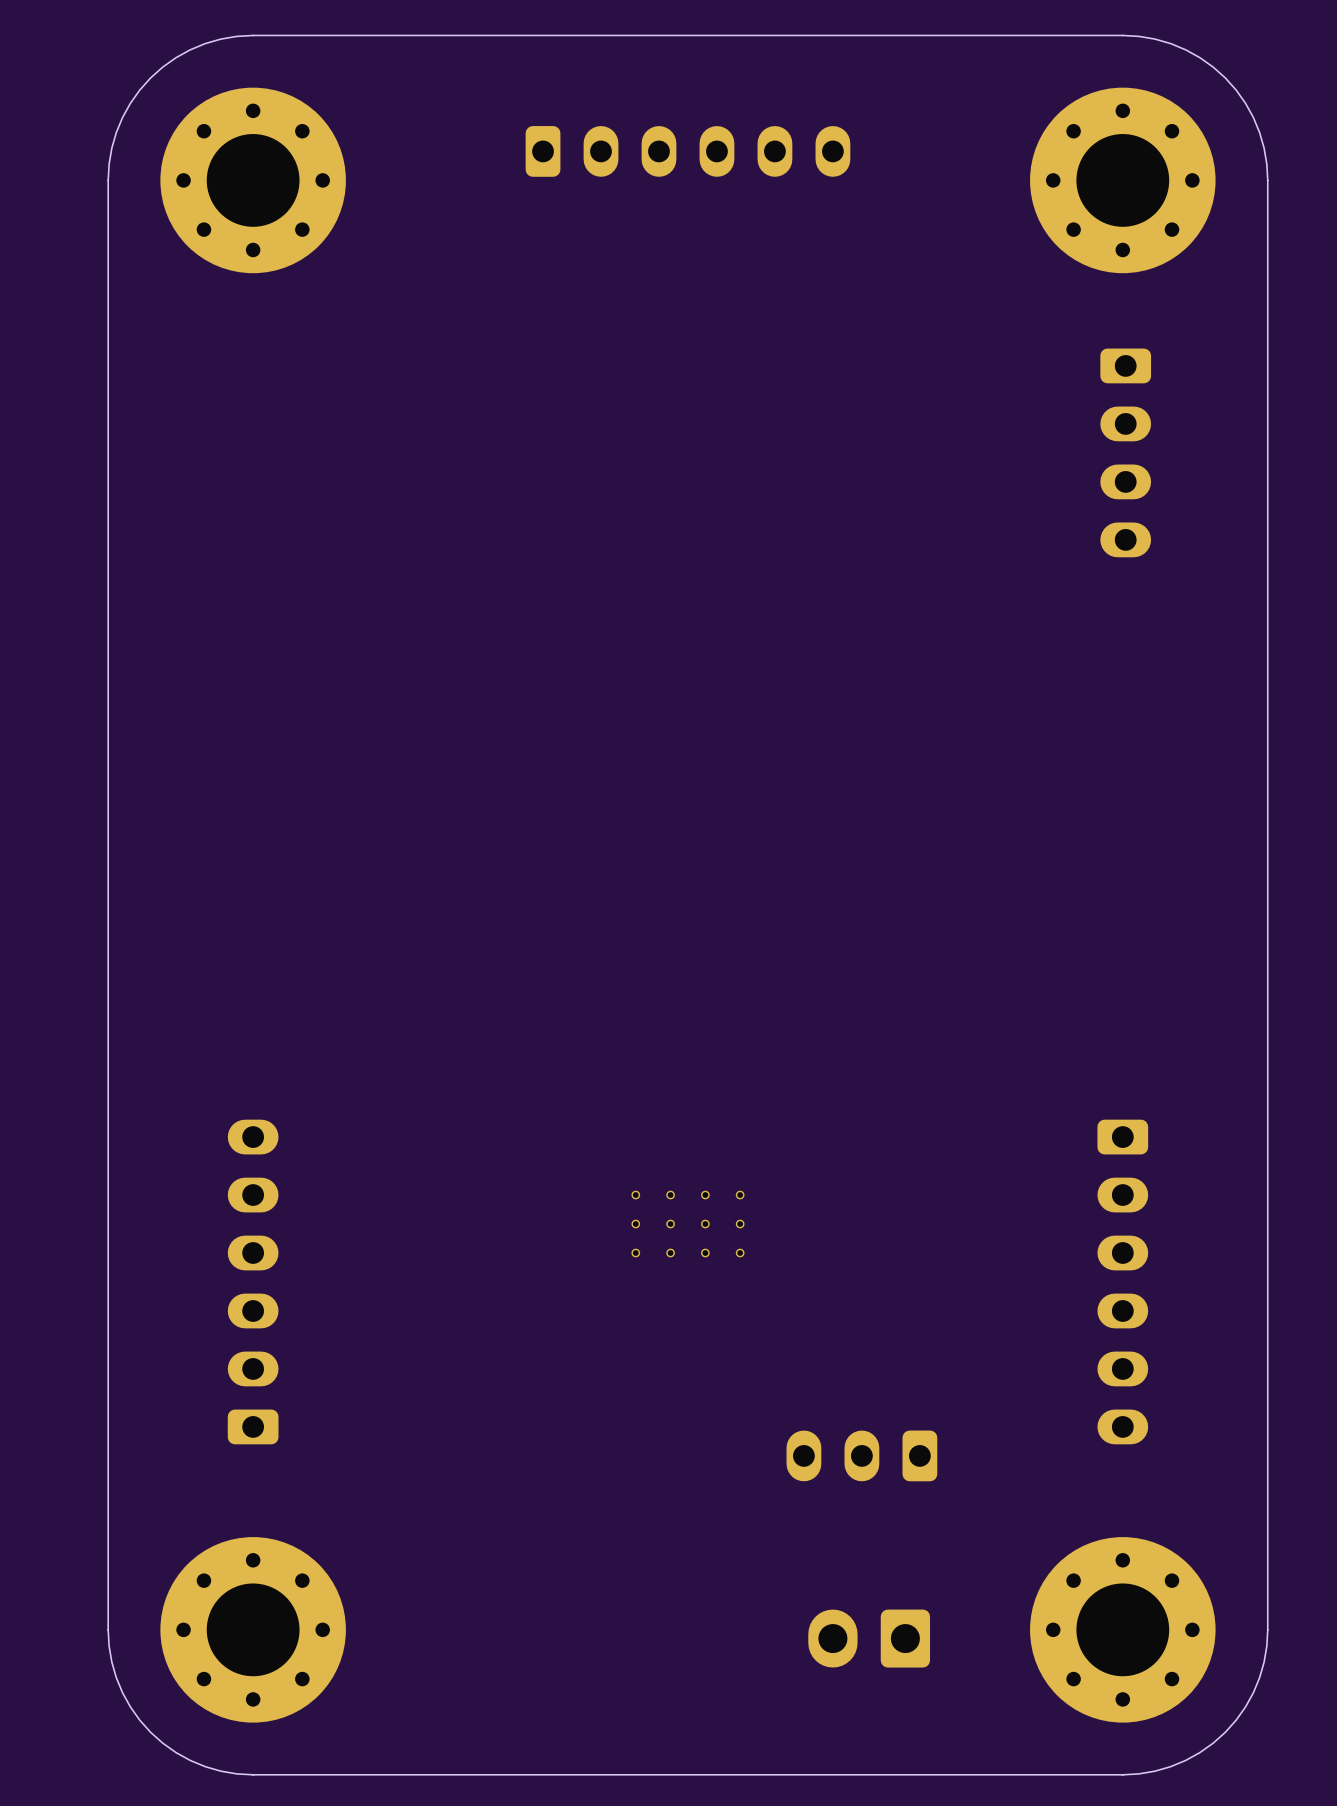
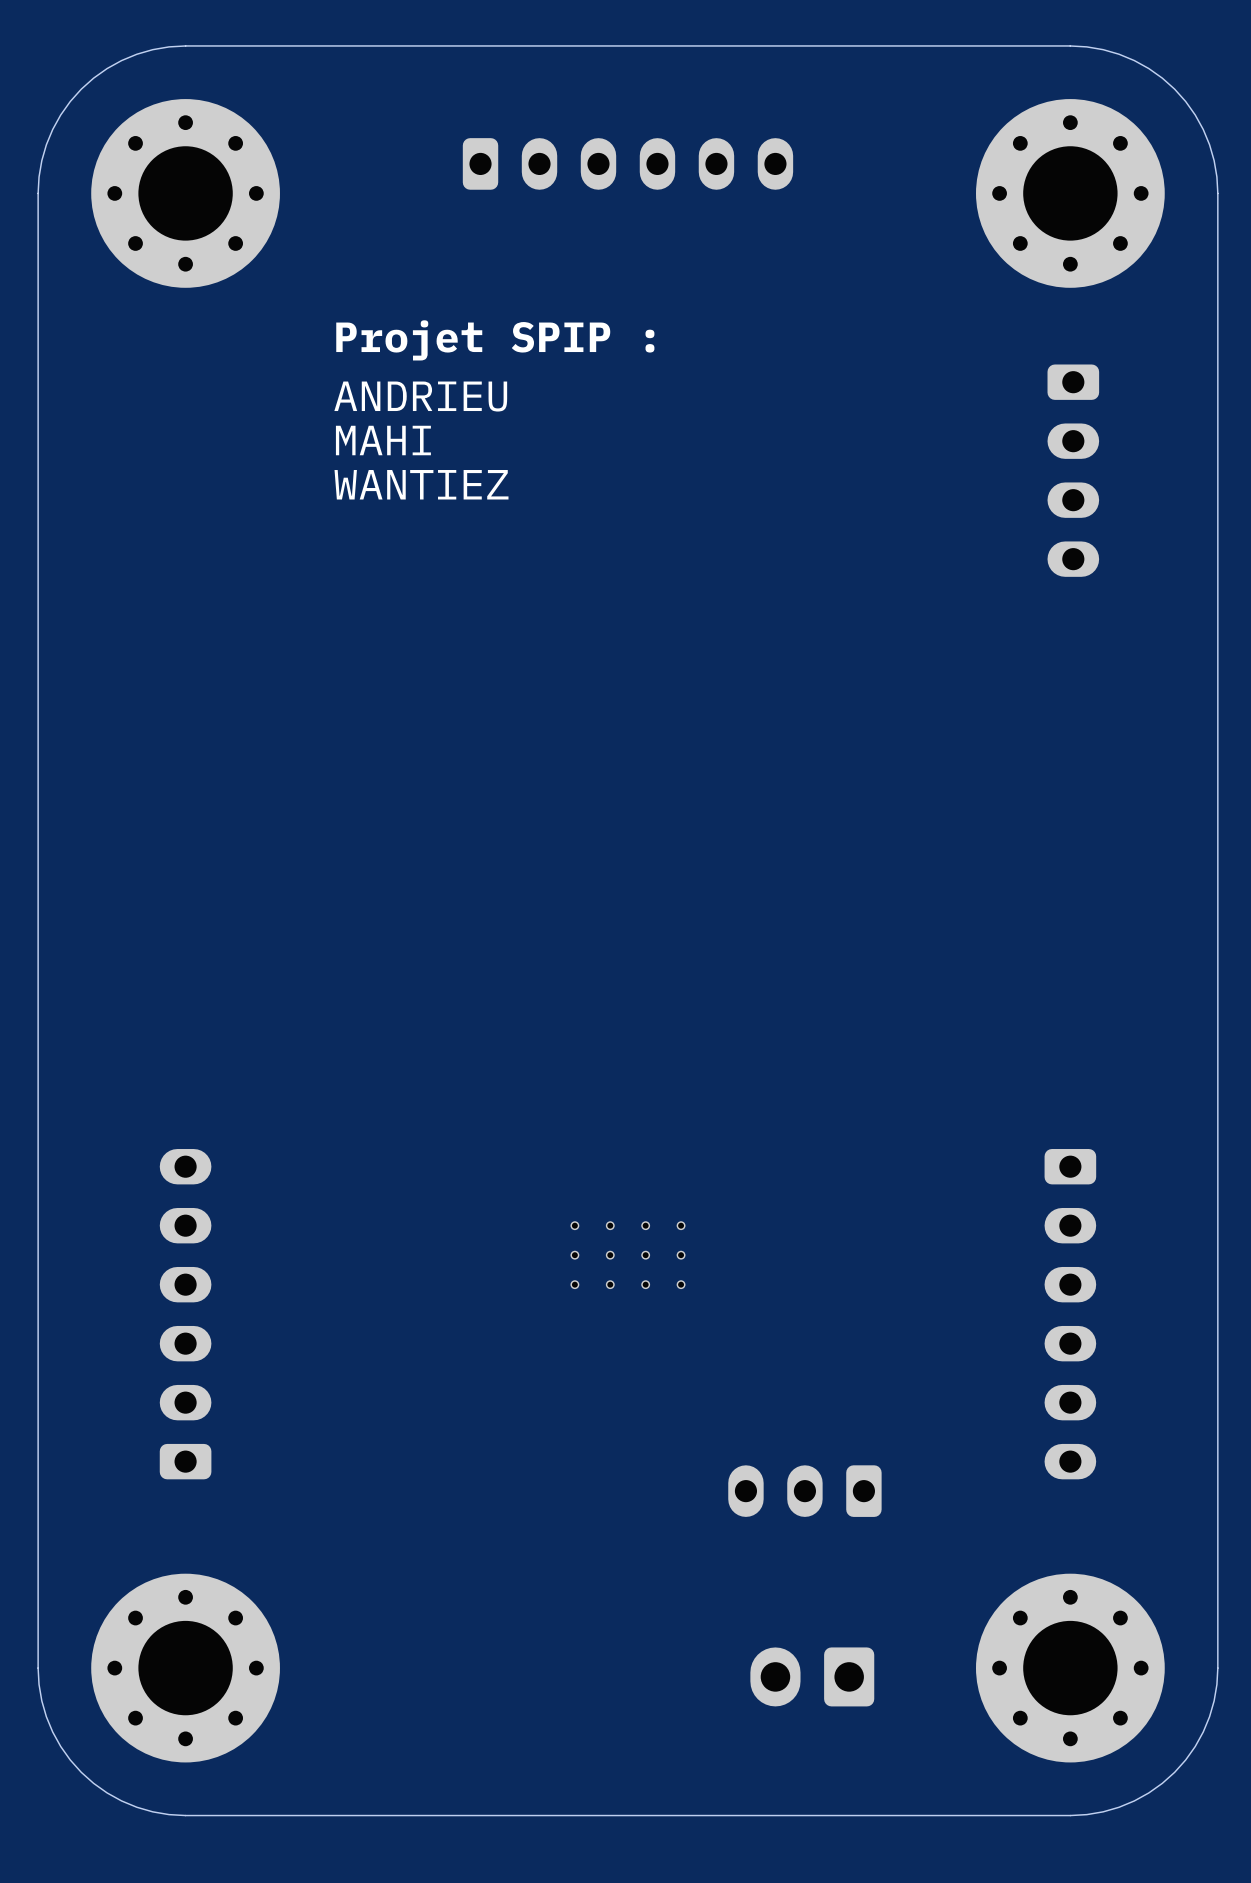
text: none -> Projet SPIP : (495, 340)
text: none -> ANDRIEU (420, 396)
text: none -> MAHI (383, 440)
text: none -> WANTIEZ (421, 484)

